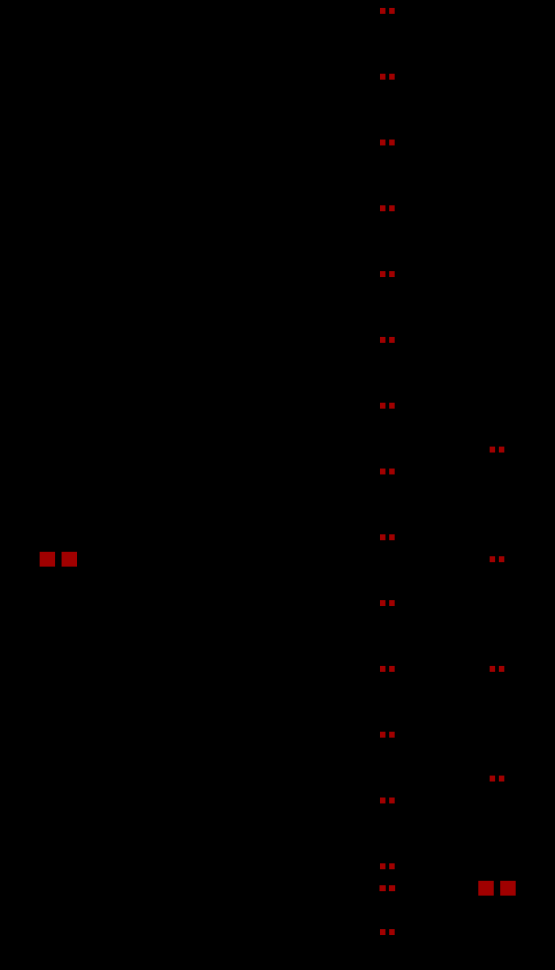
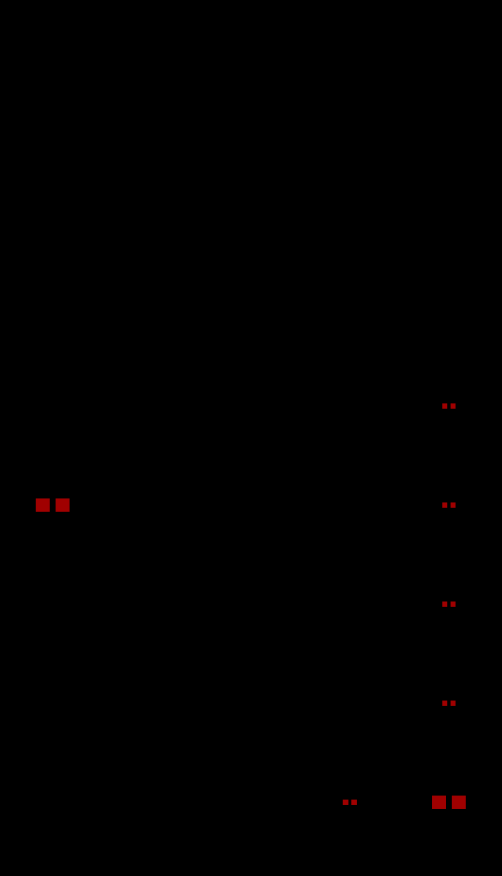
part: (387, 10) -> none
part: (387, 76) -> none
part: (387, 142) -> none
part: (387, 208) -> none
part: (387, 274) -> none
part: (387, 339) -> none
part: (387, 405) -> none
part: (387, 471) -> none
part: (387, 537) -> none
part: (387, 603) -> none
part: (387, 668) -> none
part: (387, 734) -> none
part: (387, 800) -> none
part: (387, 866) -> none
part: (387, 932) -> none

